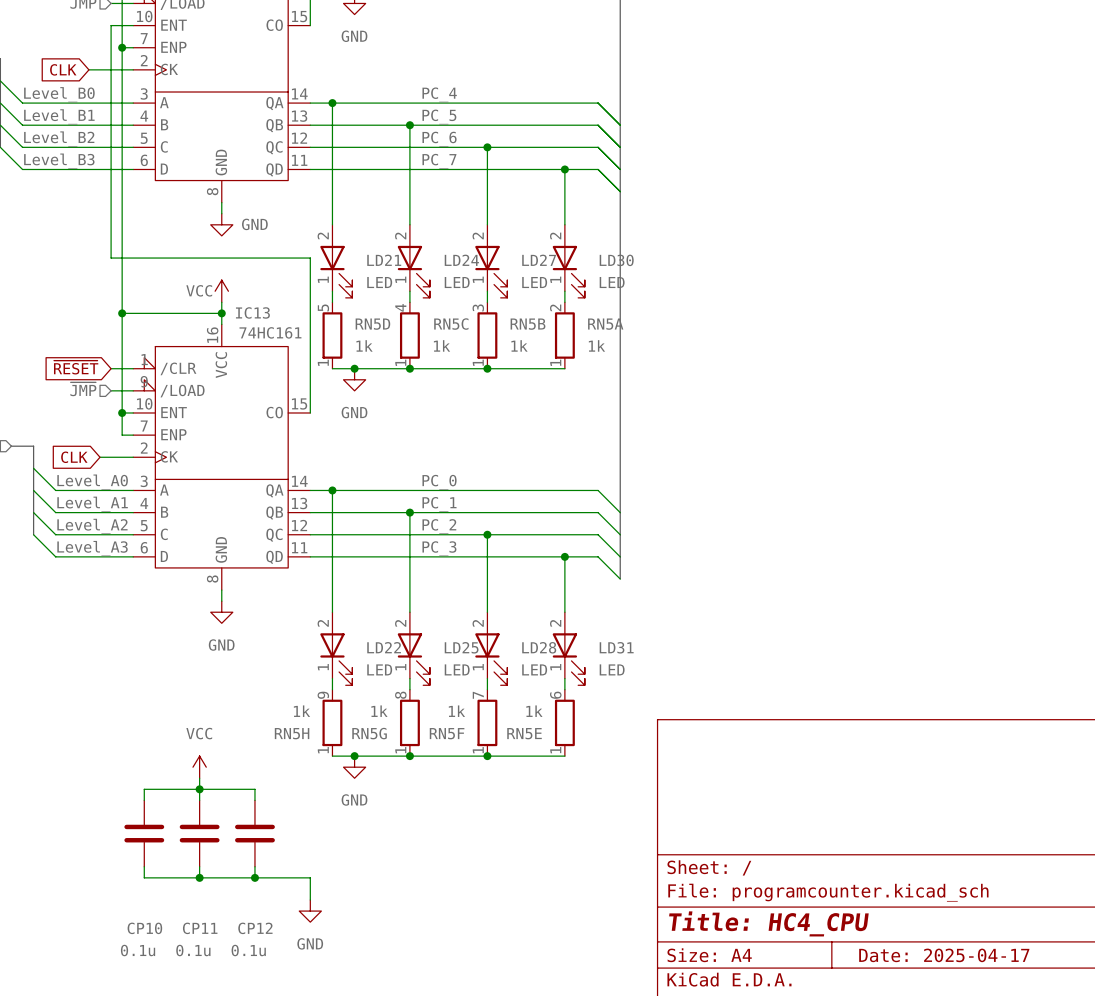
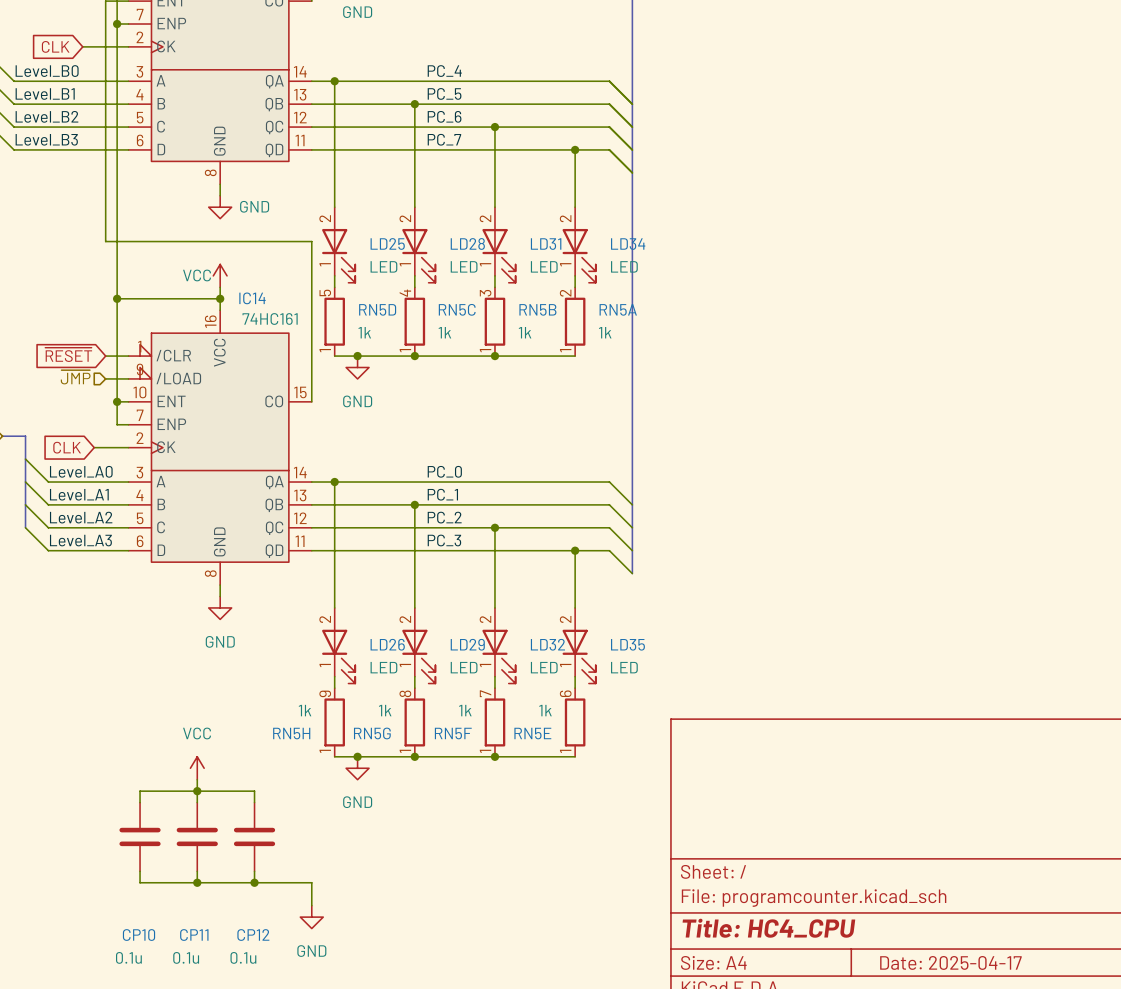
LD21 name: LD21 (384, 260) -> LD25 (387, 243)
LD24 name: LD24 (461, 260) -> LD28 (467, 243)
LD27 name: LD27 (539, 260) -> LD31 (546, 244)
LD30 name: LD30 (616, 260) -> LD34 (628, 244)
IC13 name: IC13 (252, 312) -> IC14 (252, 298)
LD22 name: LD22 (384, 647) -> LD26 (387, 644)
LD25 name: LD25 (461, 647) -> LD29 (467, 644)
LD28 name: LD28 (539, 647) -> LD32 (547, 644)
LD31 name: LD31 (616, 647) -> LD35 (627, 644)

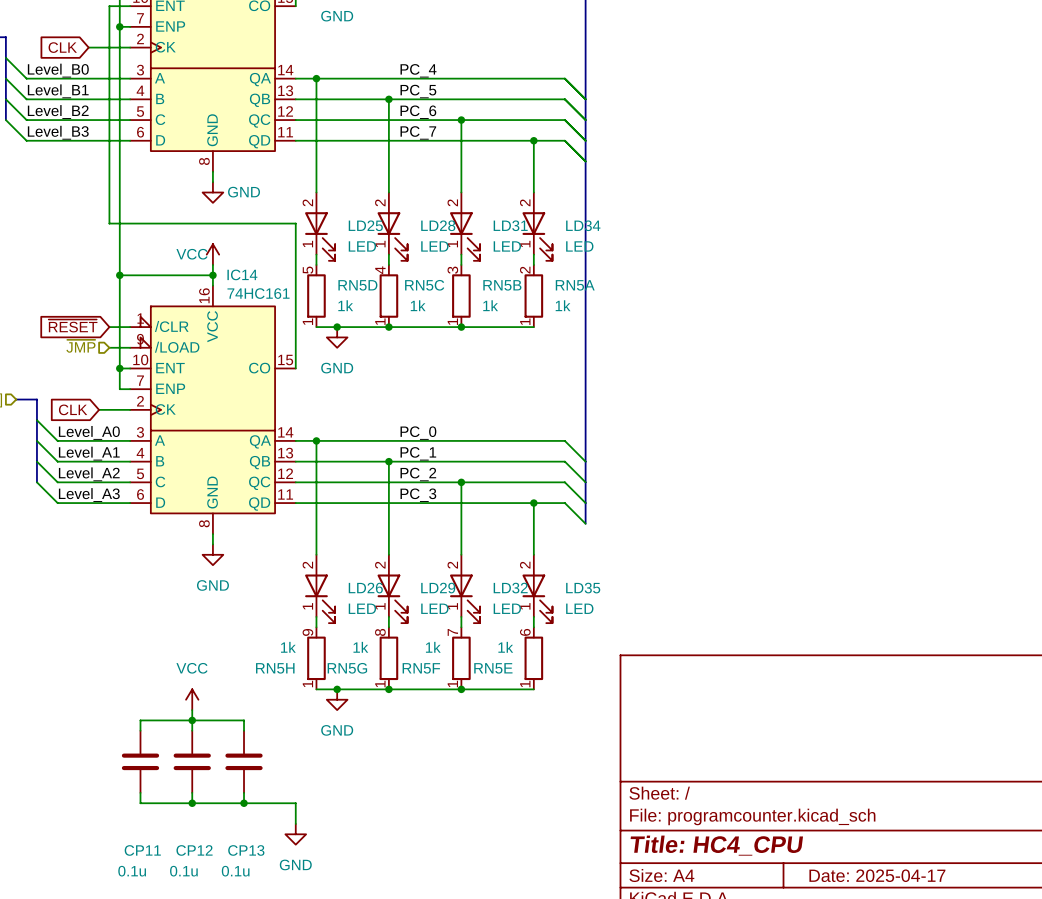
CP10 name: CP10 (139, 935) -> CP11 (142, 850)
CP11 name: CP11 (194, 935) -> CP12 (194, 850)
CP12 name: CP12 (253, 935) -> CP13 (246, 850)

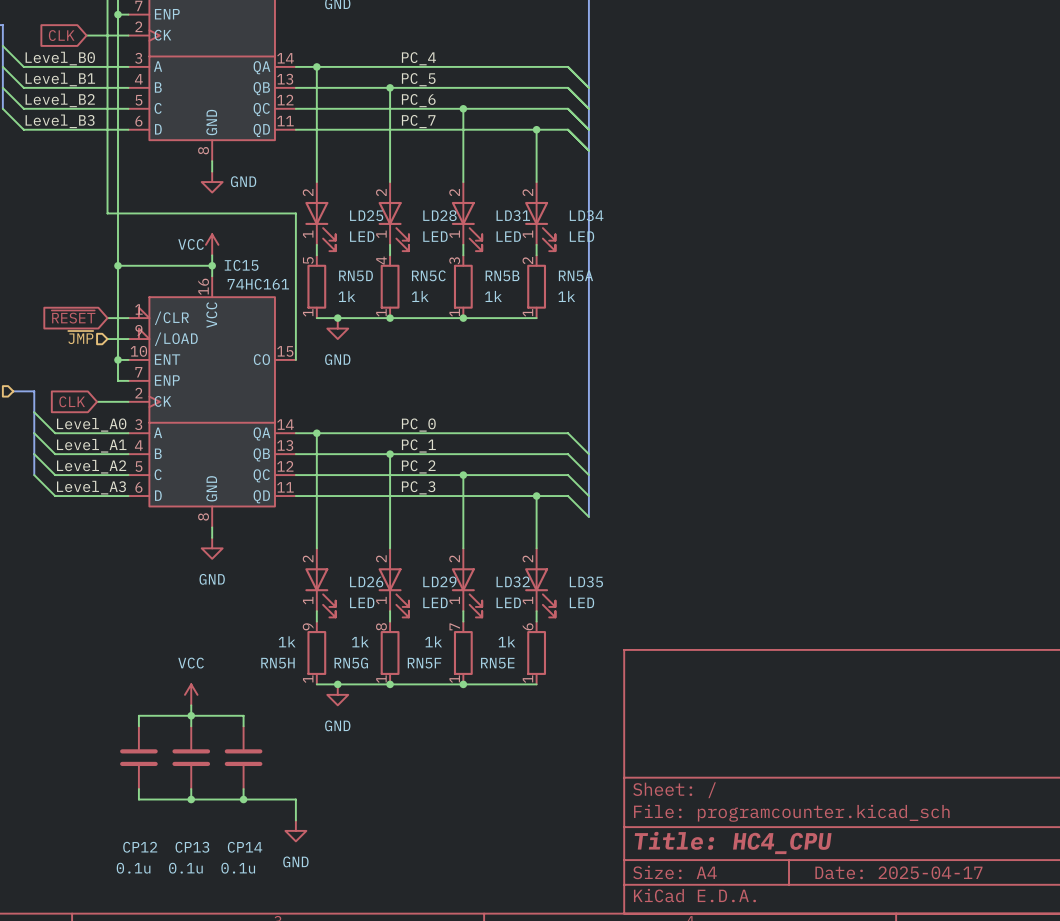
IC14 name: IC14 (242, 274) -> IC15 (241, 265)
CP11 name: CP11 (142, 850) -> CP12 (140, 847)
CP12 name: CP12 (194, 850) -> CP13 (192, 847)
CP13 name: CP13 (246, 850) -> CP14 (245, 847)

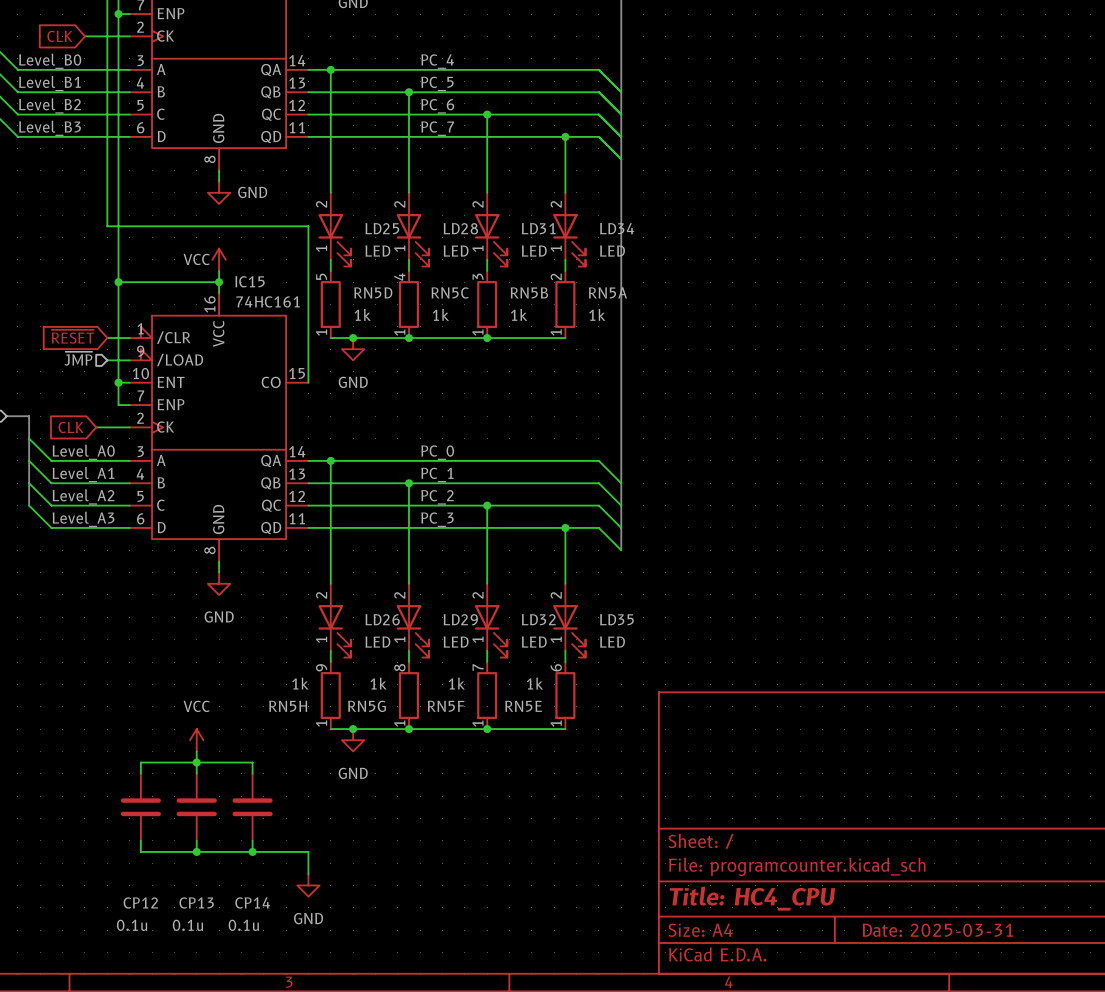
title block: Date: 2025-04-17 (898, 872) -> Date: 2025-03-31 (937, 930)

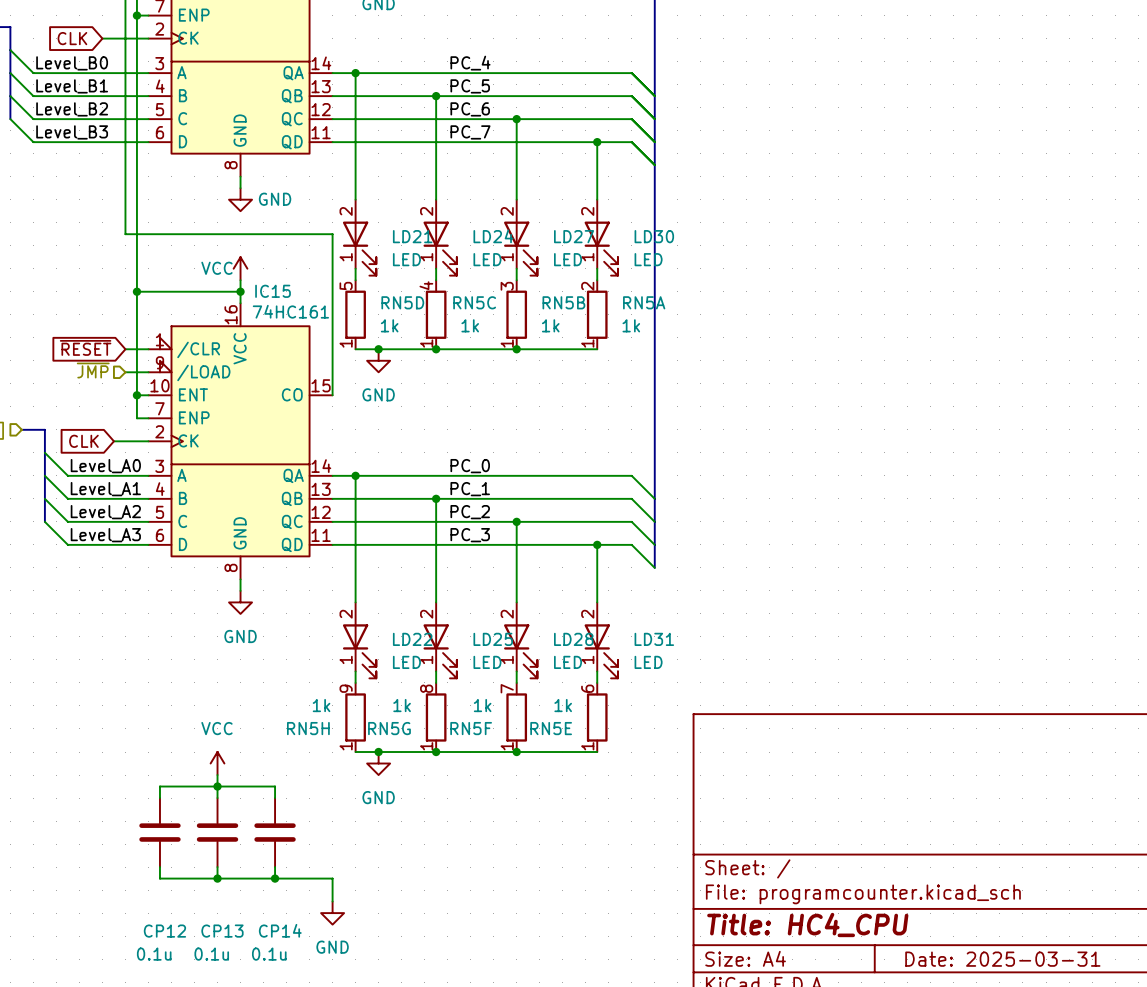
LD25 name: LD25 (382, 228) -> LD21 (412, 236)
LD28 name: LD28 (460, 228) -> LD24 (493, 236)
LD31 name: LD31 (538, 228) -> LD27 (574, 236)
LD34 name: LD34 (617, 228) -> LD30 (654, 236)
LD26 name: LD26 (382, 619) -> LD22 (412, 639)
LD29 name: LD29 (460, 619) -> LD25 (493, 639)
LD32 name: LD32 (538, 619) -> LD28 (573, 639)
LD35 name: LD35 (616, 619) -> LD31 (654, 639)

